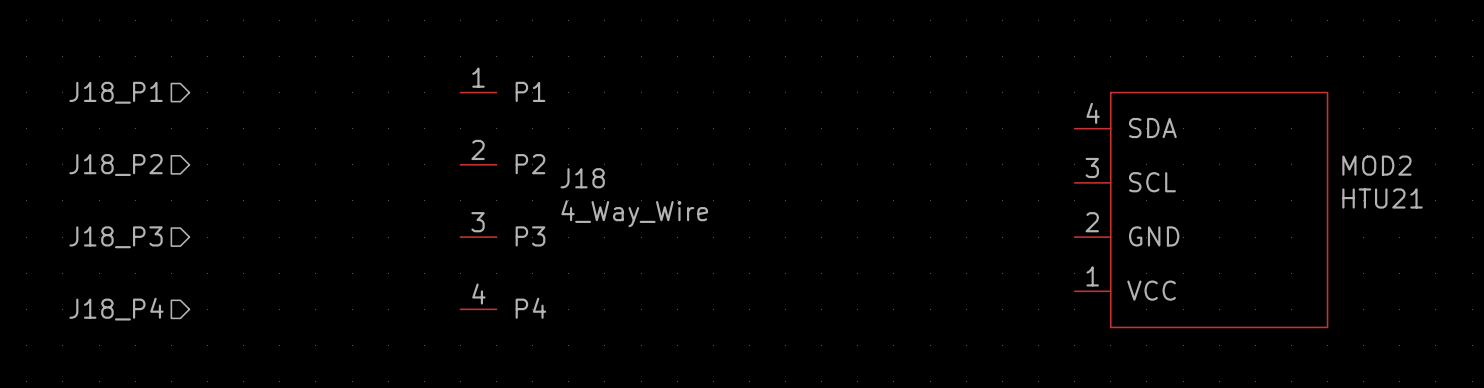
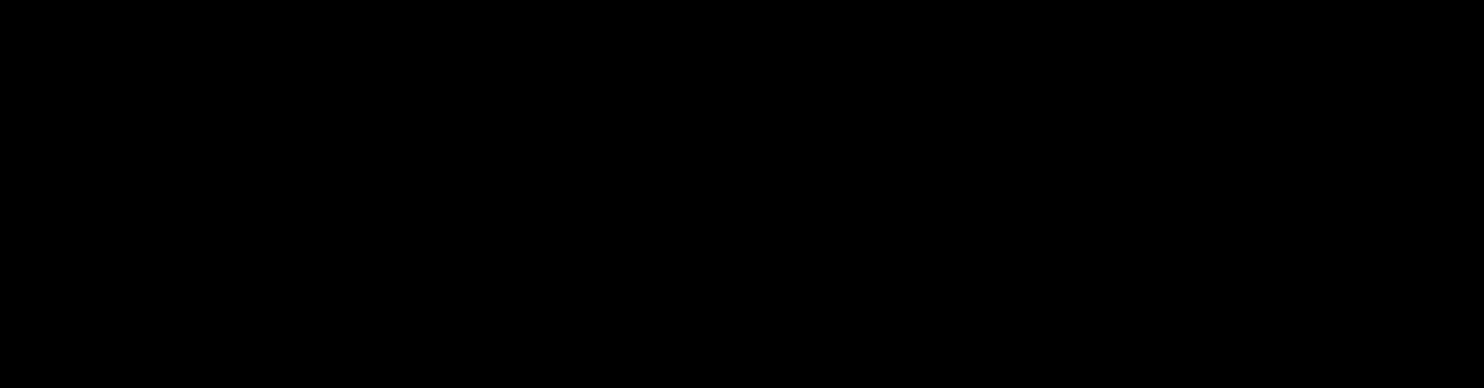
hierarchical label: J18_P1 (116, 92) -> none
hierarchical label: J18_P2 (116, 165) -> none
J18: 4_Way_Wire (478, 200) -> none
MOD2: HTU21 (1201, 210) -> none
hierarchical label: J18_P3 (116, 237) -> none
hierarchical label: J18_P4 (116, 309) -> none

